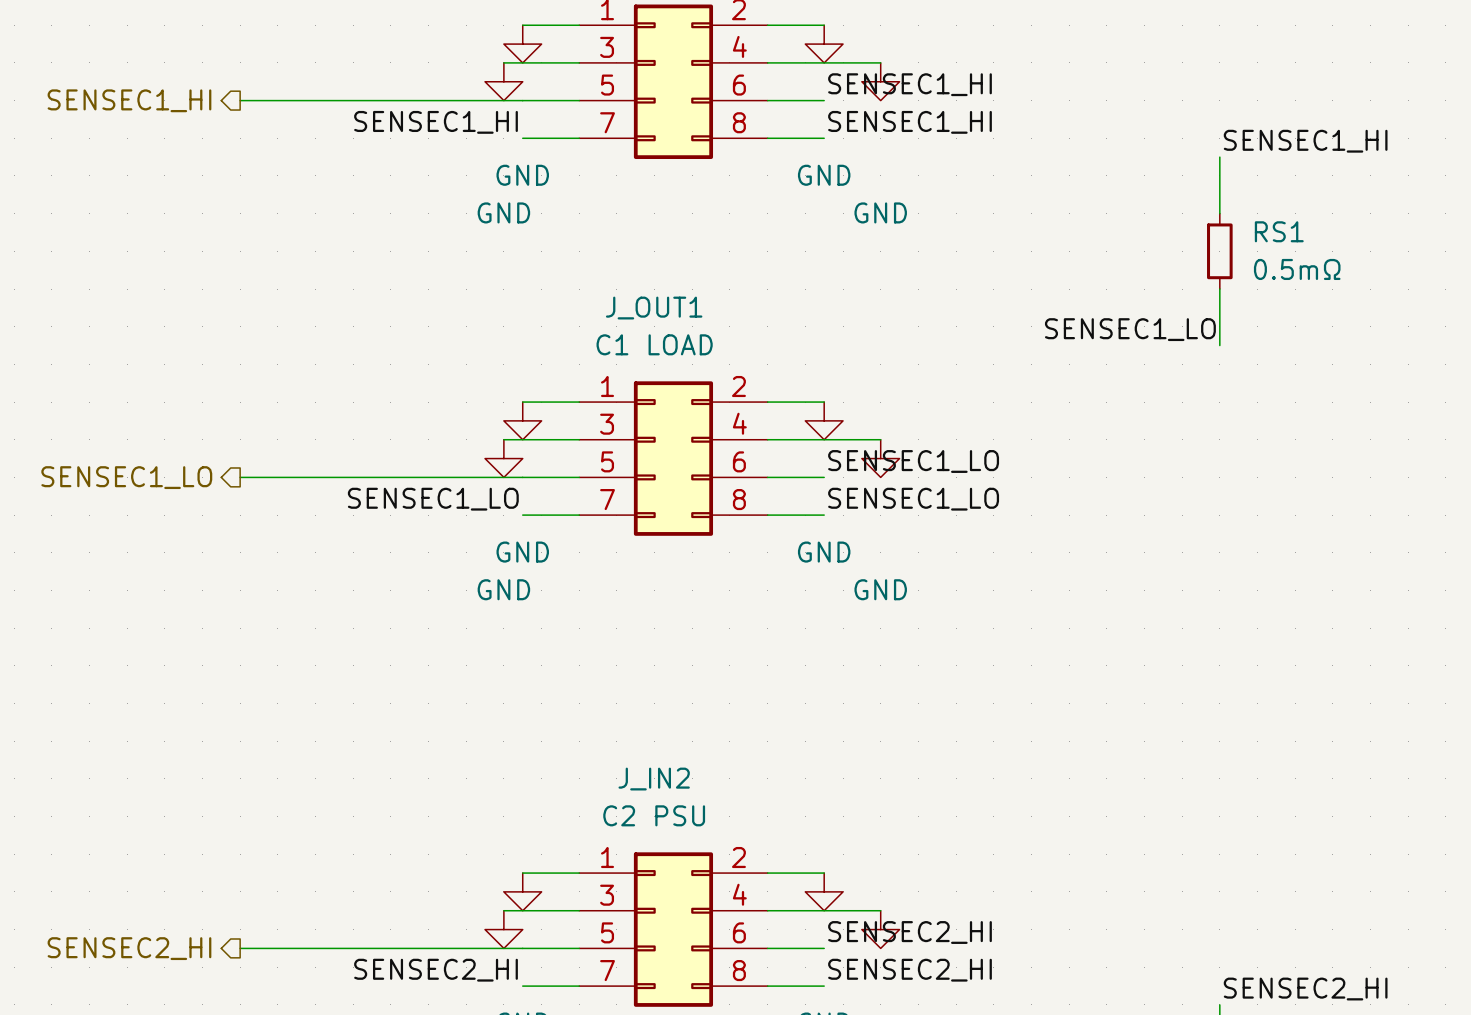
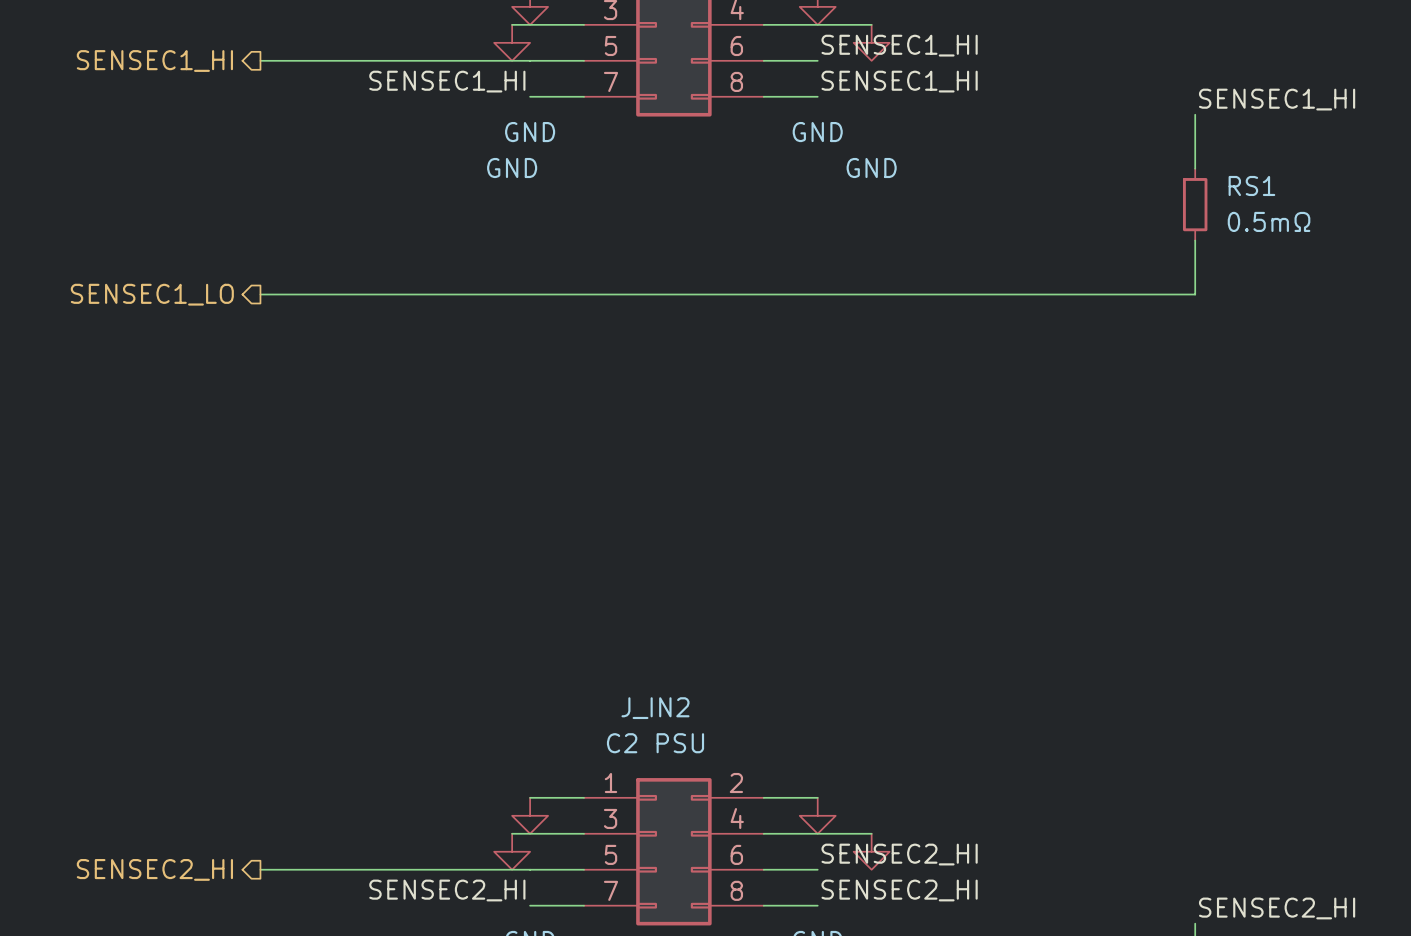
label: SENSEC1_LO (1130, 329) -> none
wire: none -> (260, 294) (1195, 294)
wire: (522, 402) (579, 402) -> none
wire: (767, 402) (824, 402) -> none
power symbol: GND (522, 420) -> none
power symbol: GND (824, 420) -> none
wire: (503, 439) (579, 439) -> none
wire: (767, 439) (880, 439) -> none
power symbol: GND (503, 458) -> none
J_OUT1: C1 LOAD (673, 458) -> none
power symbol: GND (880, 458) -> none
label: SENSEC1_LO (913, 461) -> none
hierarchical label position: SENSEC1_LO (126, 477) -> SENSEC1_LO (152, 294)
wire: (240, 477) (579, 477) -> none
wire: (767, 477) (824, 477) -> none
label: SENSEC1_LO (433, 499) -> none
label: SENSEC1_LO (913, 499) -> none
wire: (522, 515) (579, 515) -> none
wire: (767, 515) (824, 515) -> none

